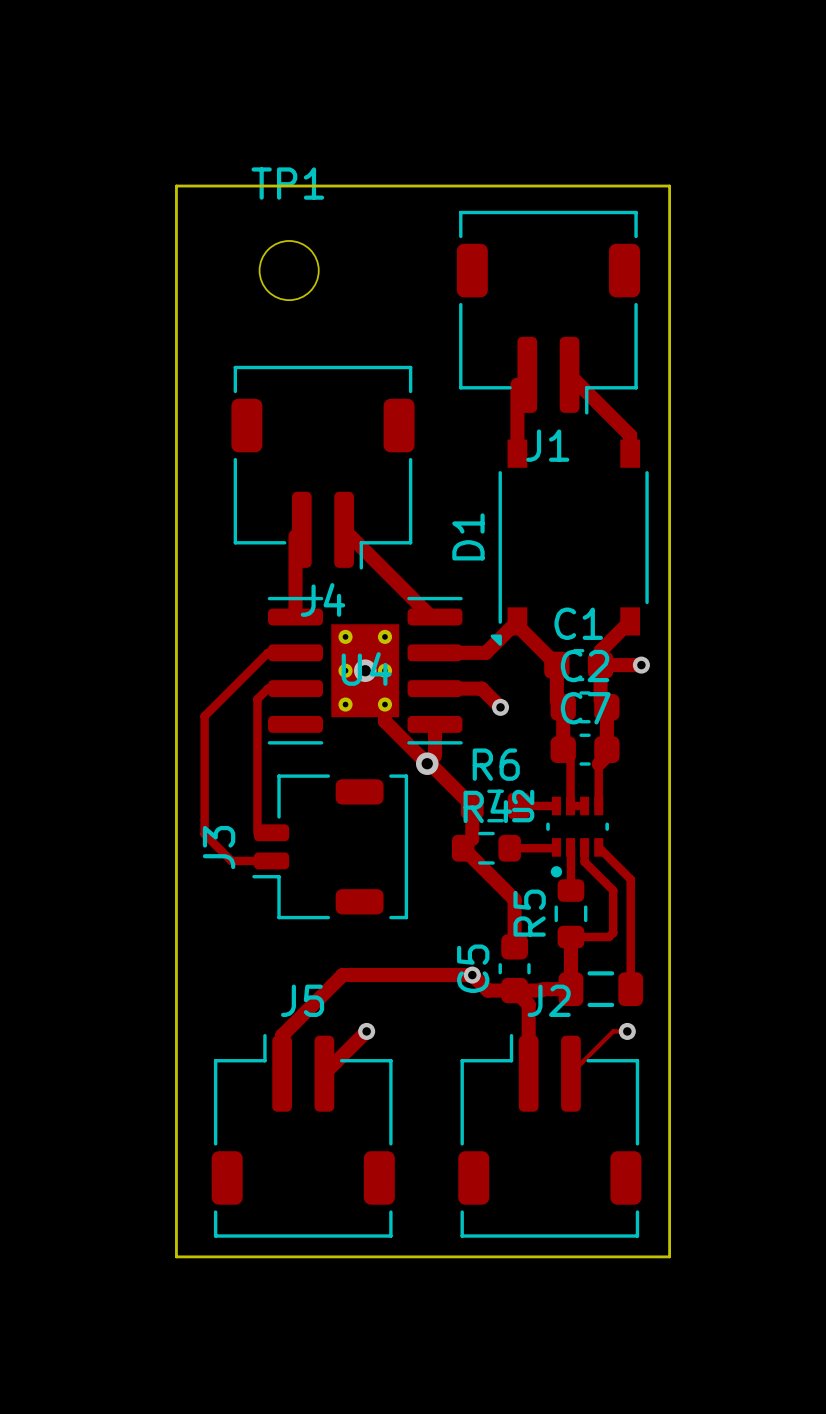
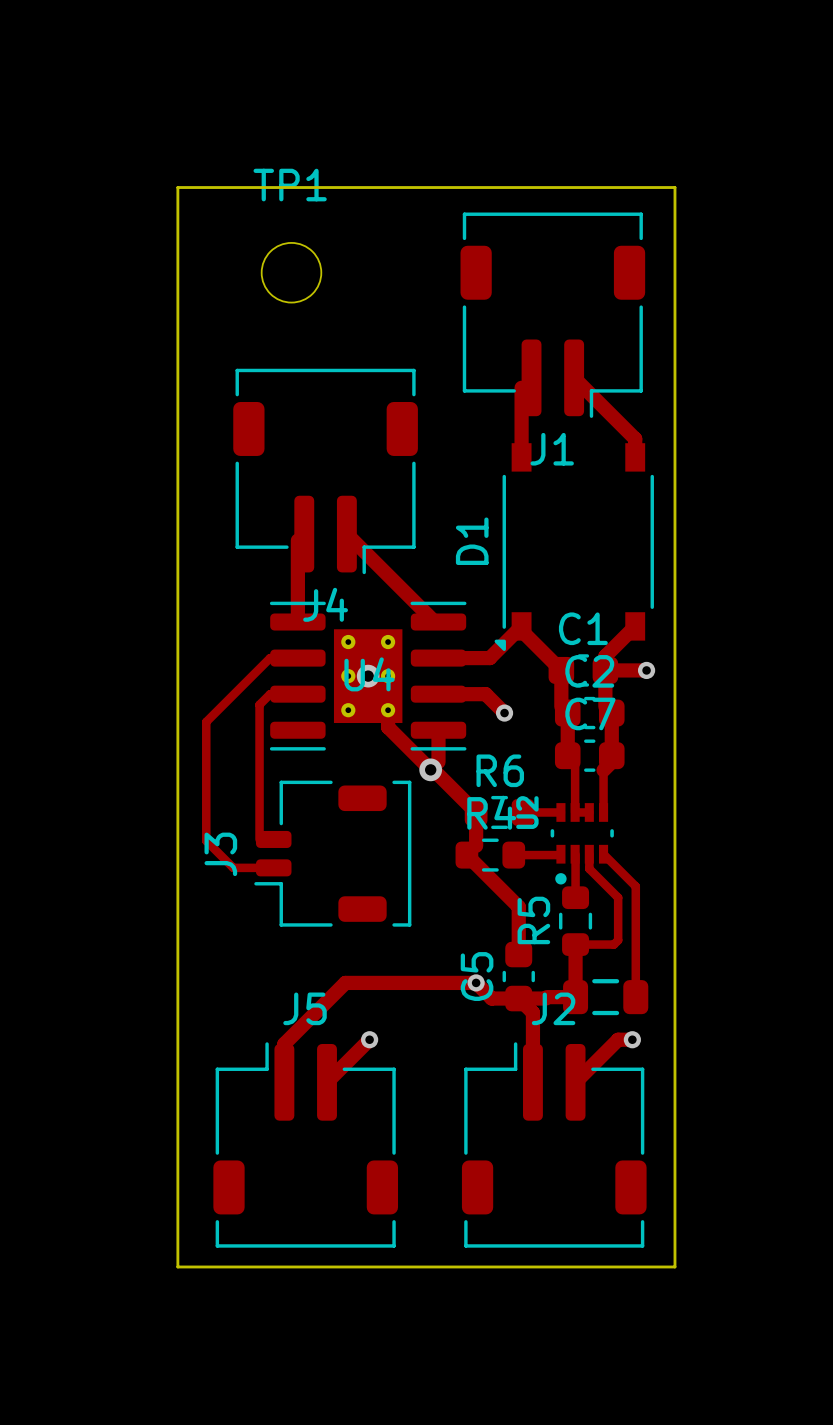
track width: thin (627, 1031) (613, 1031) (570, 1073) -> thick (632, 1039) (618, 1039) (575, 1082)

